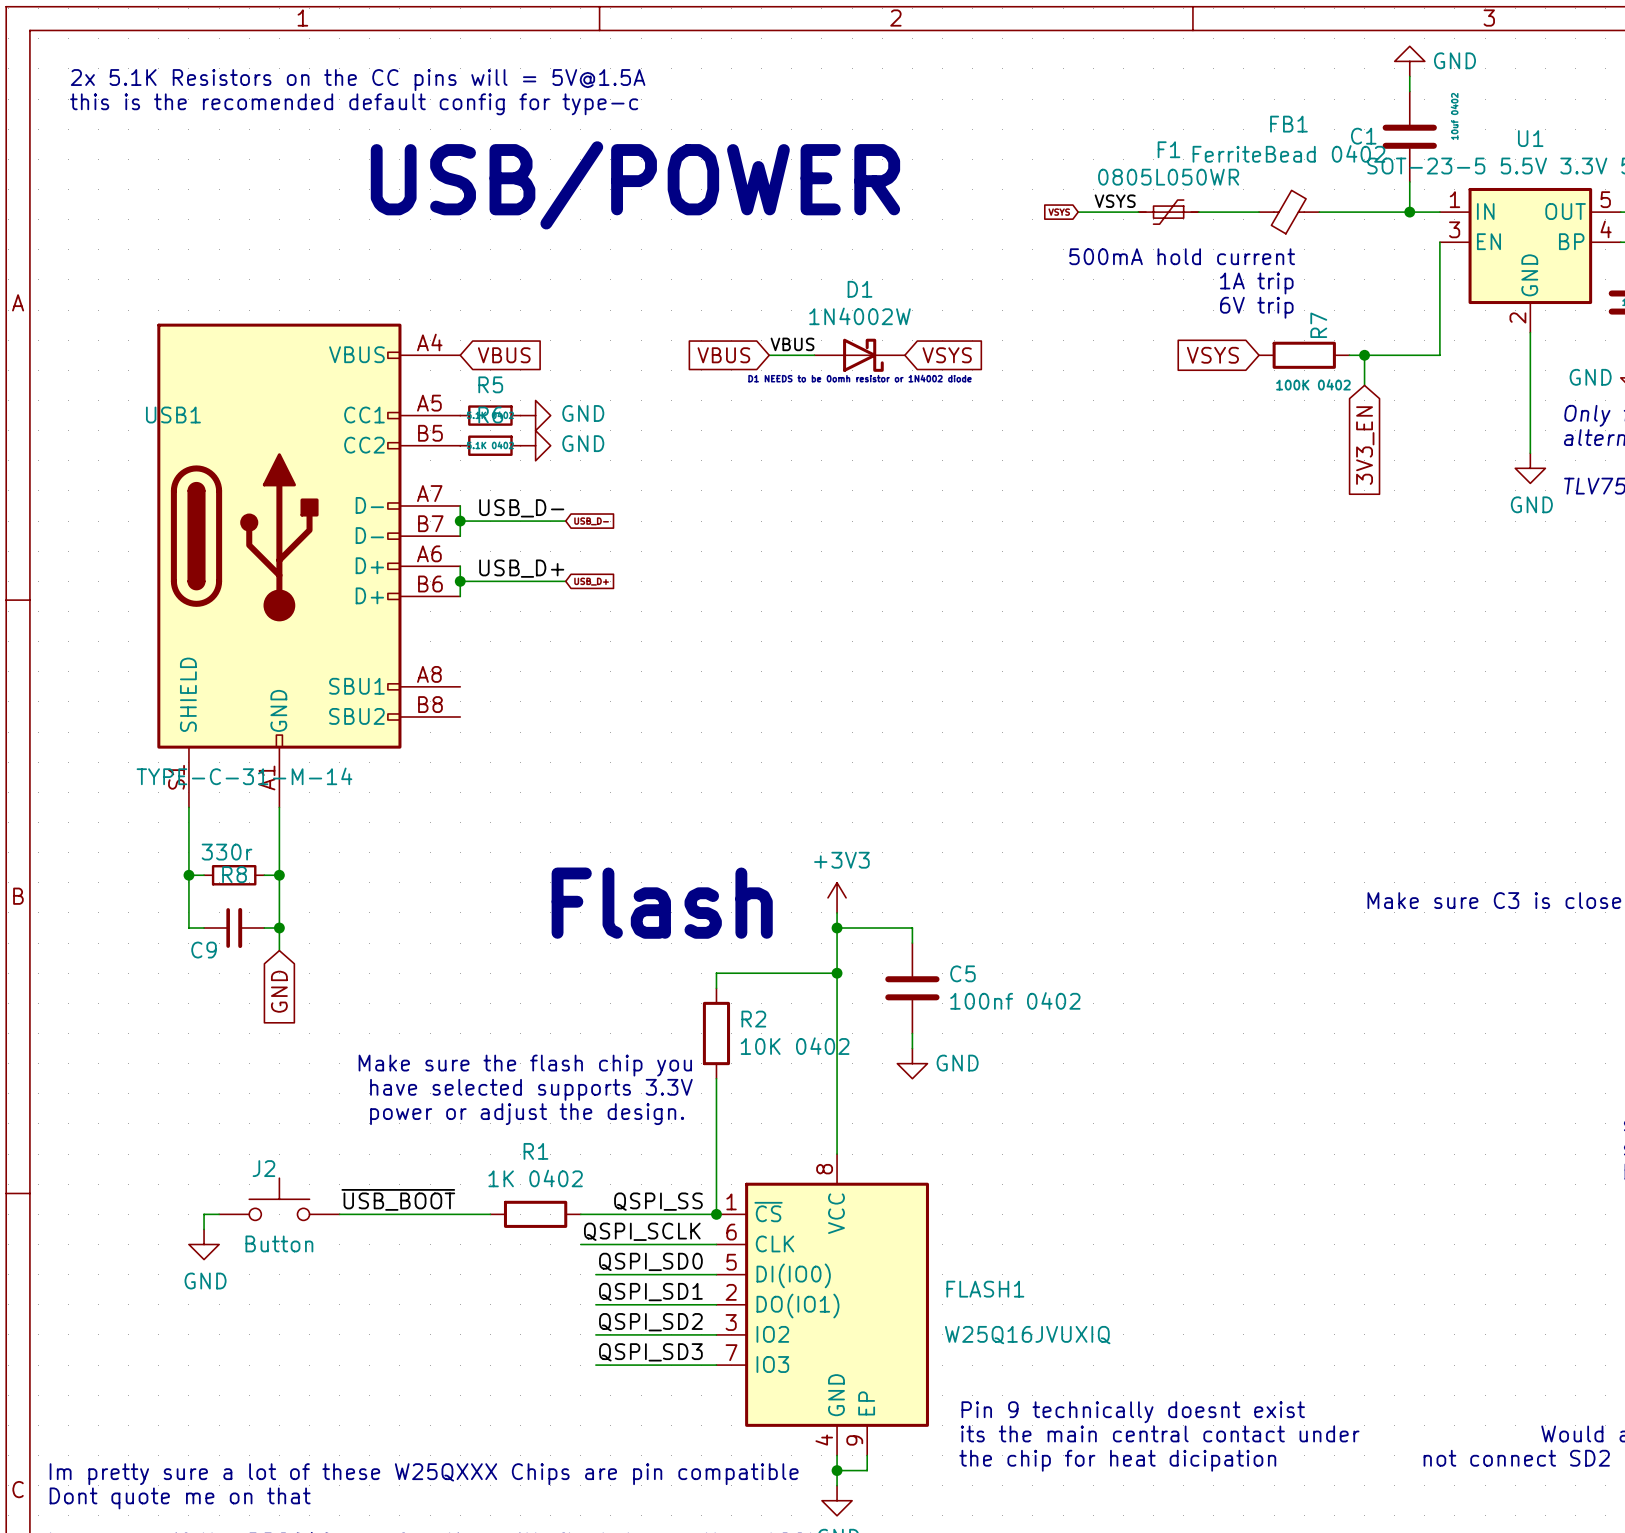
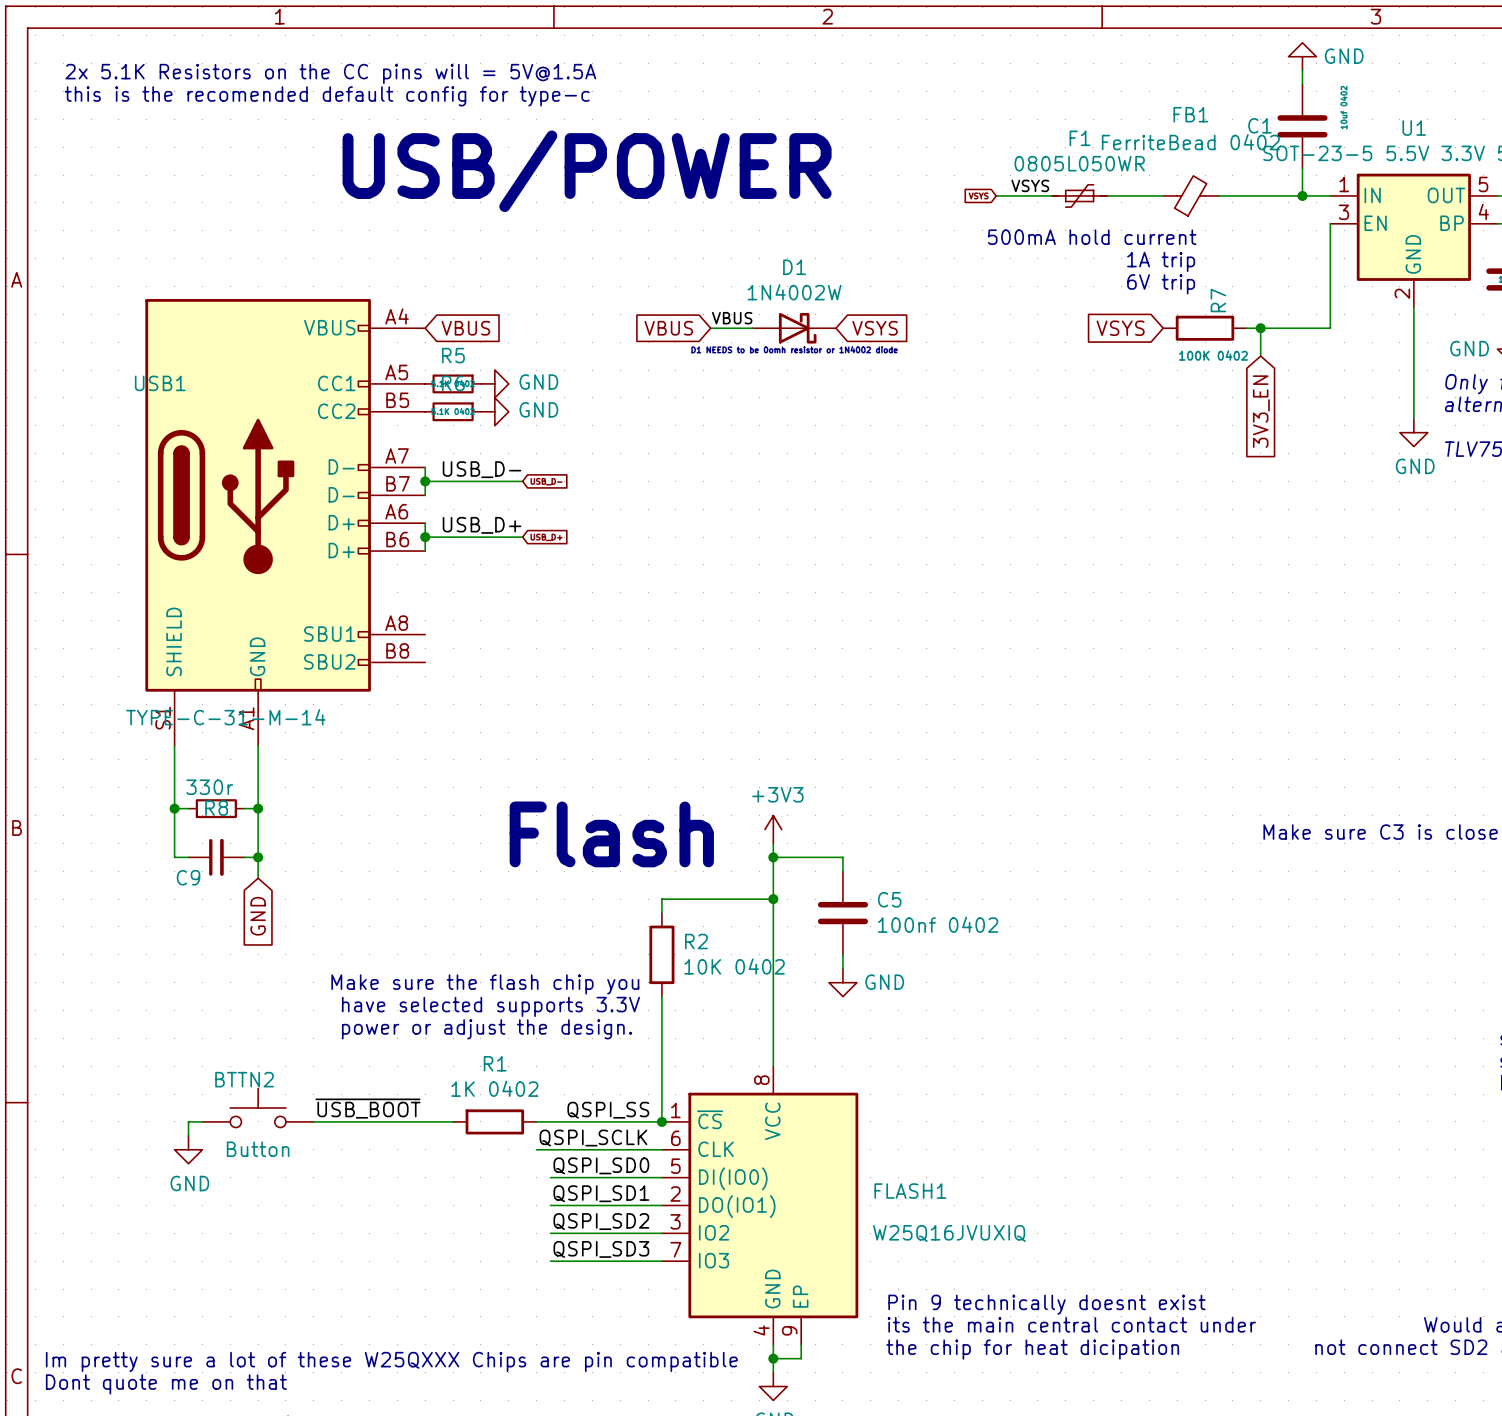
J2 name: J2 (263, 1168) -> BTTN2 (244, 1079)

